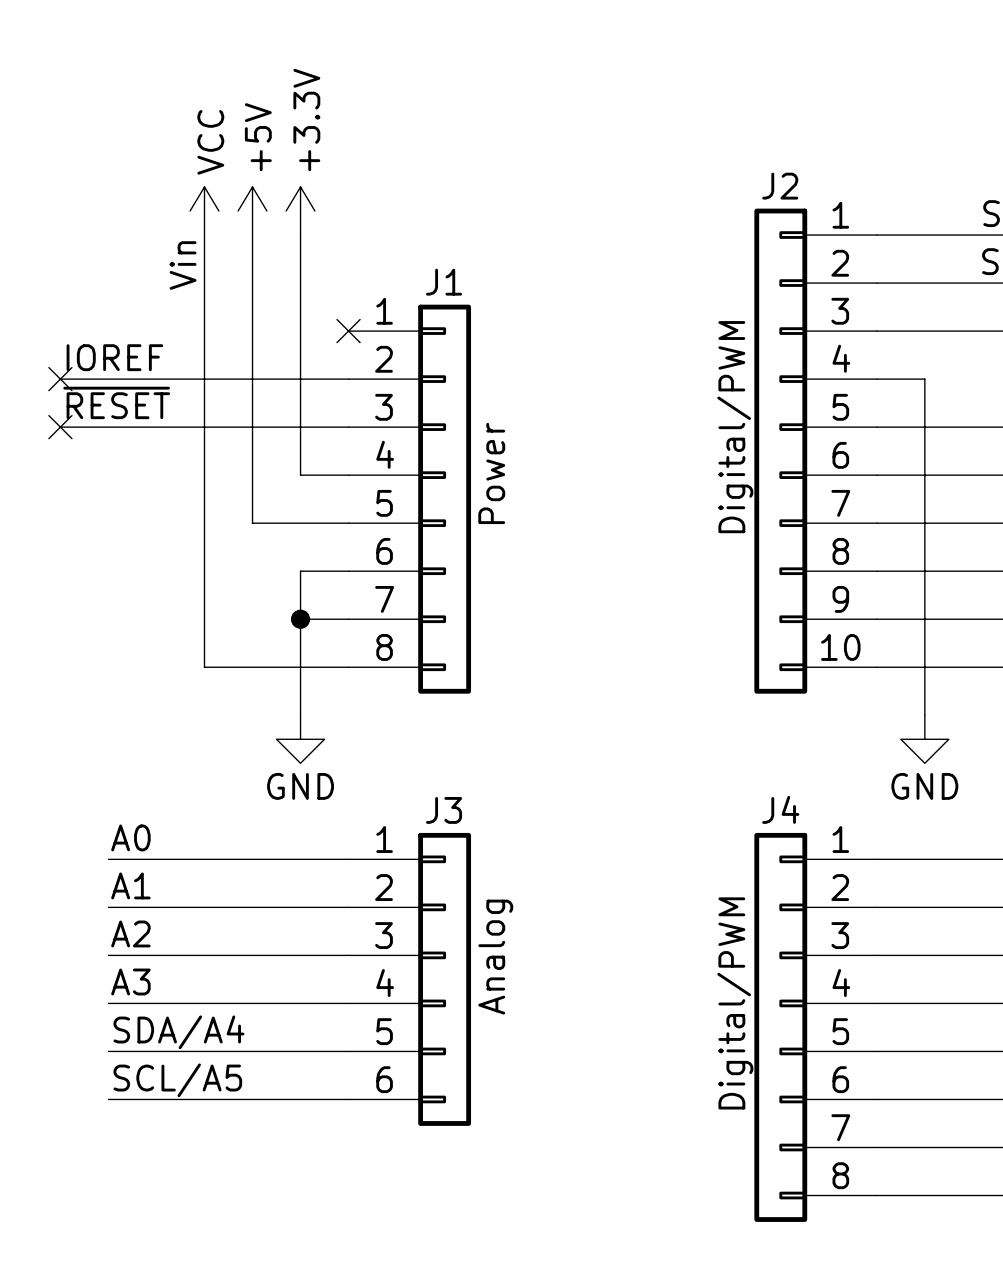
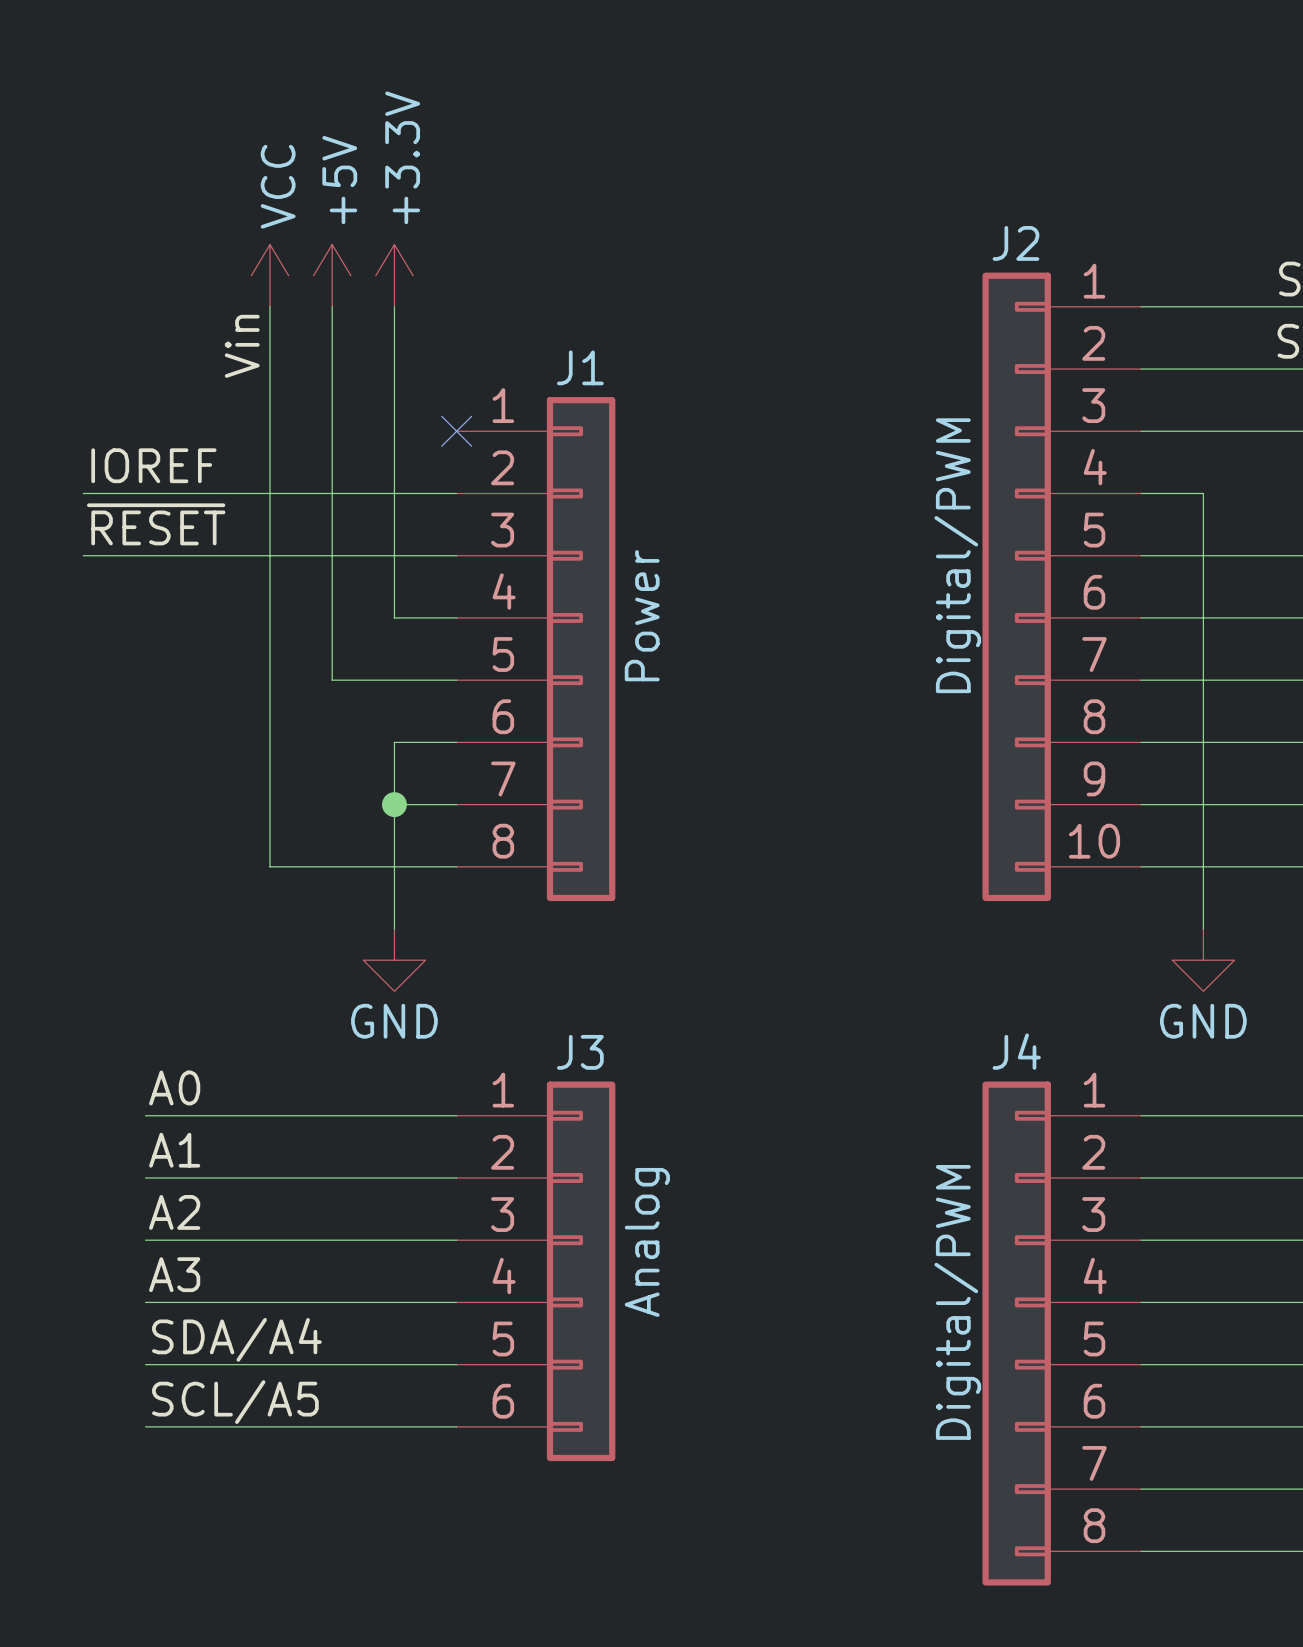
no-connect mark: (60, 379) -> none
no-connect mark: (60, 427) -> none

